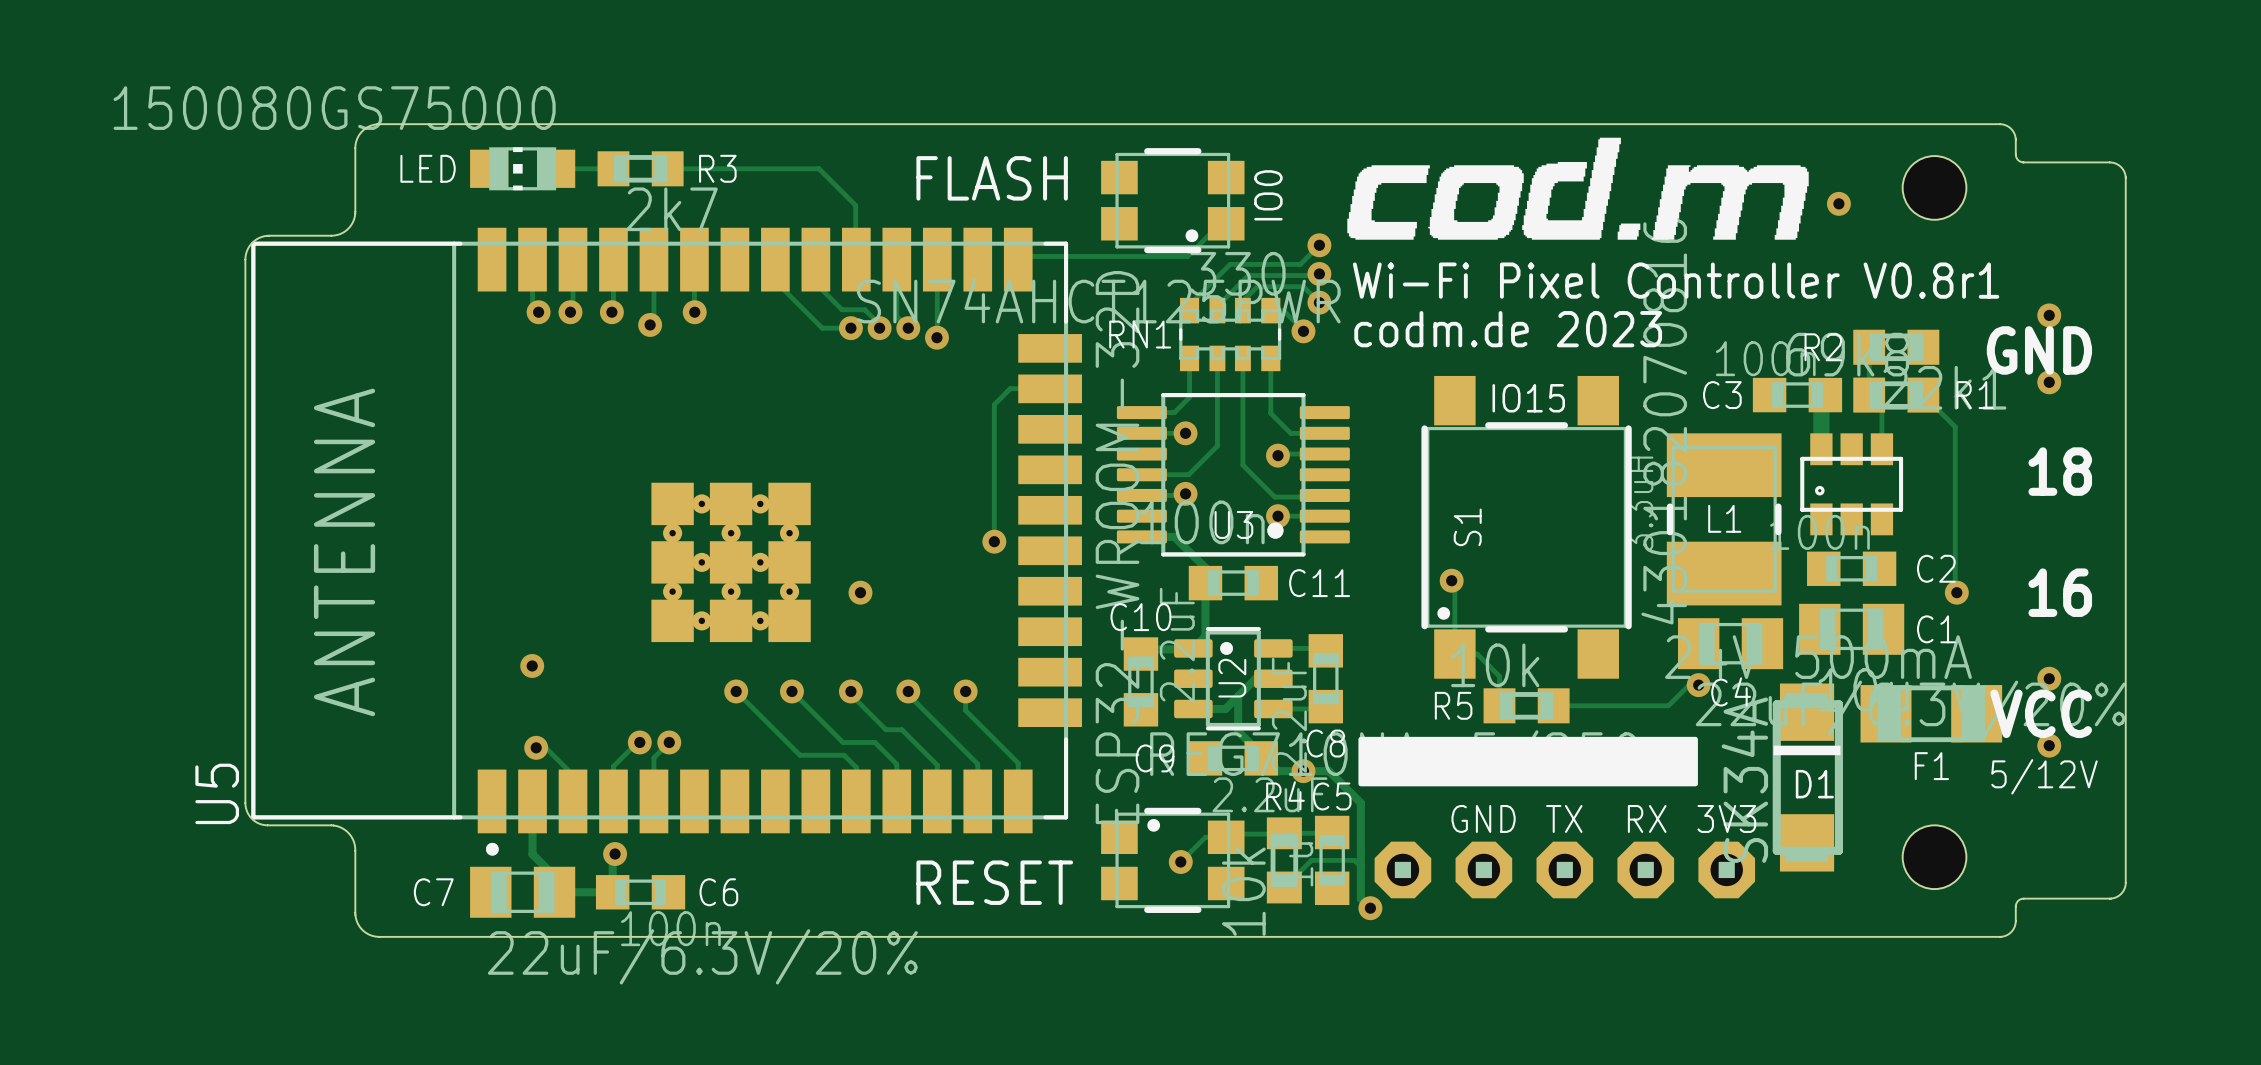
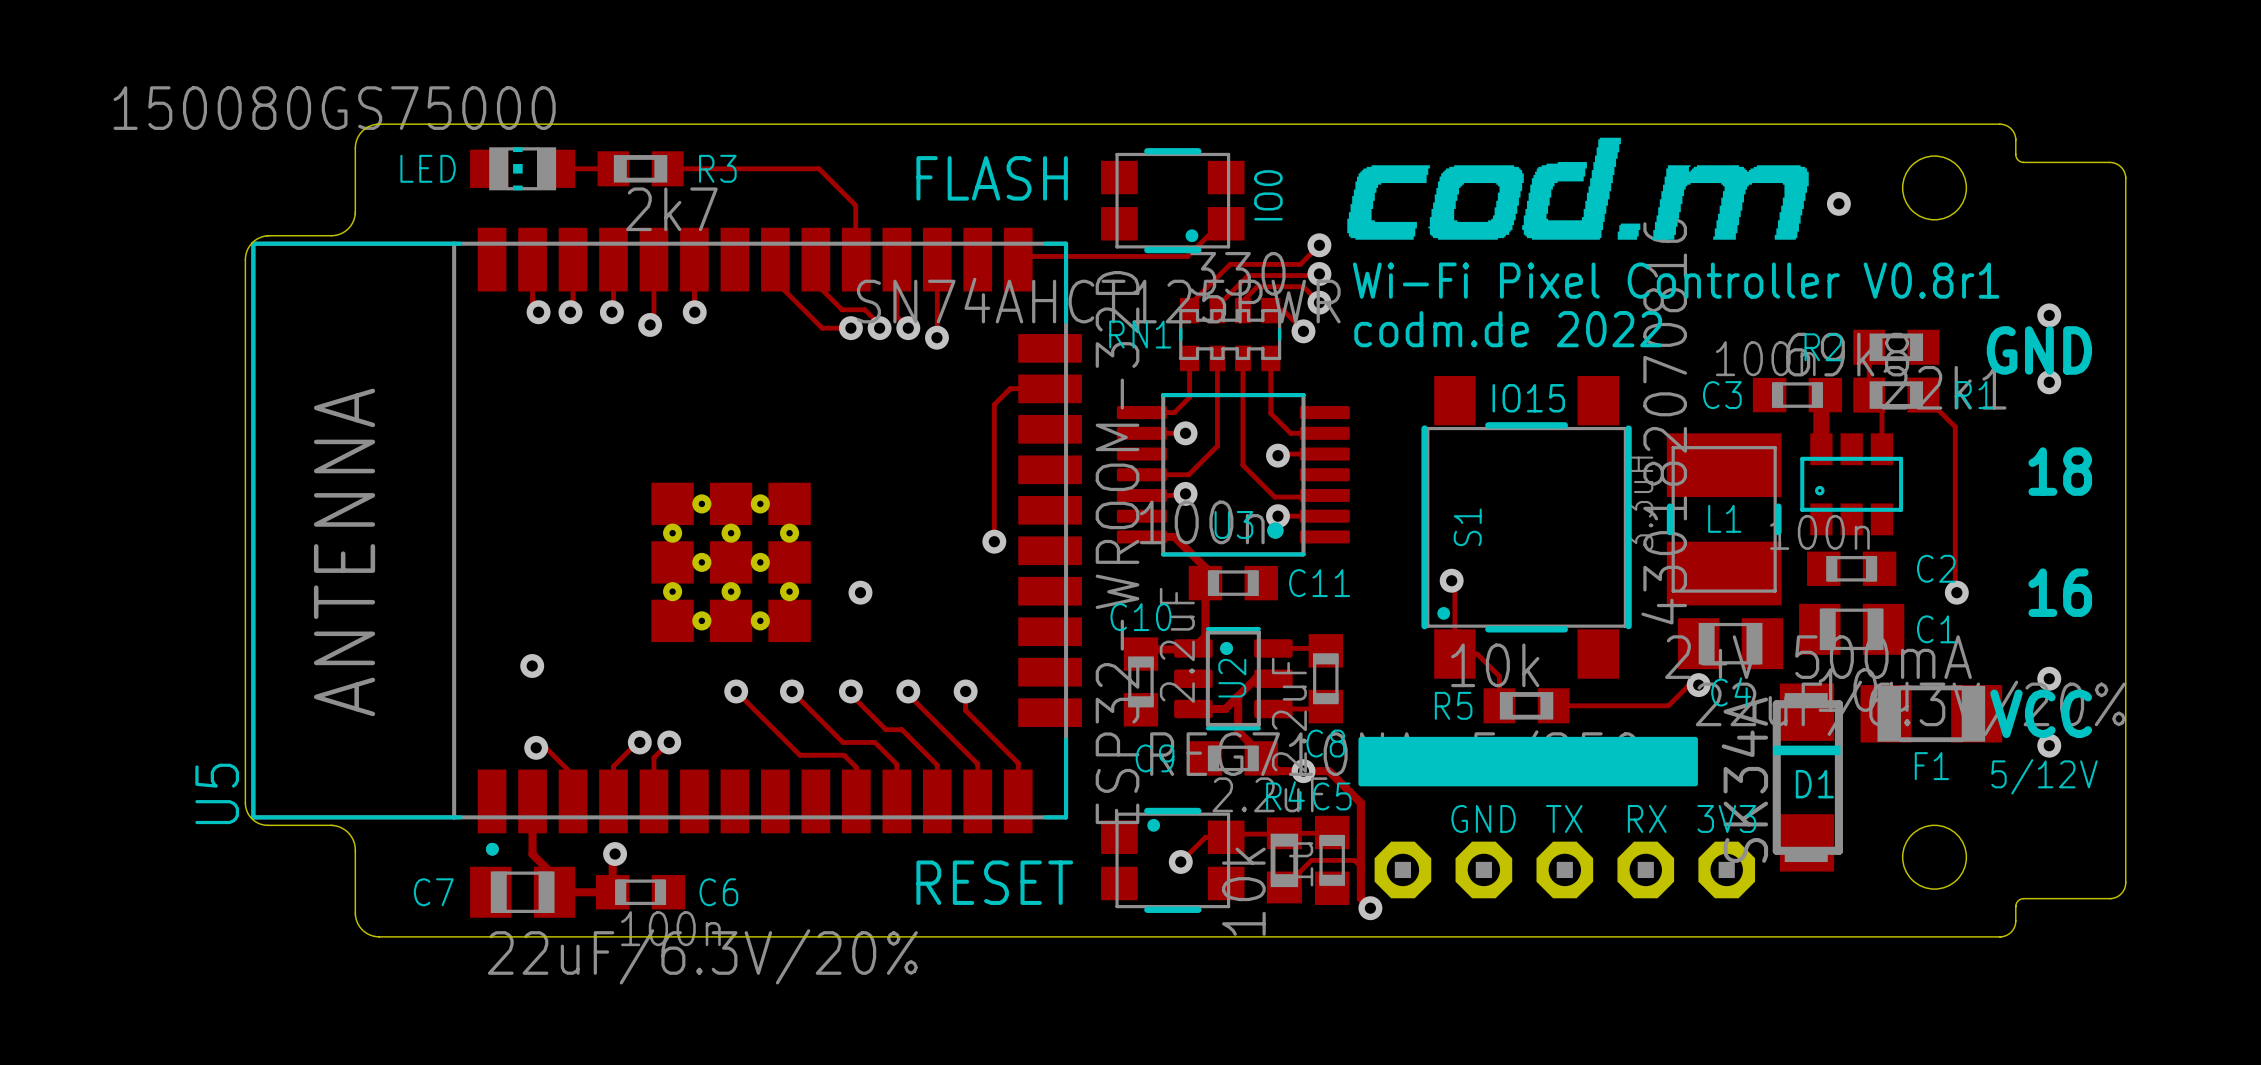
text: codm.de 2023 (1508, 329) -> codm.de 2022 (1508, 329)

